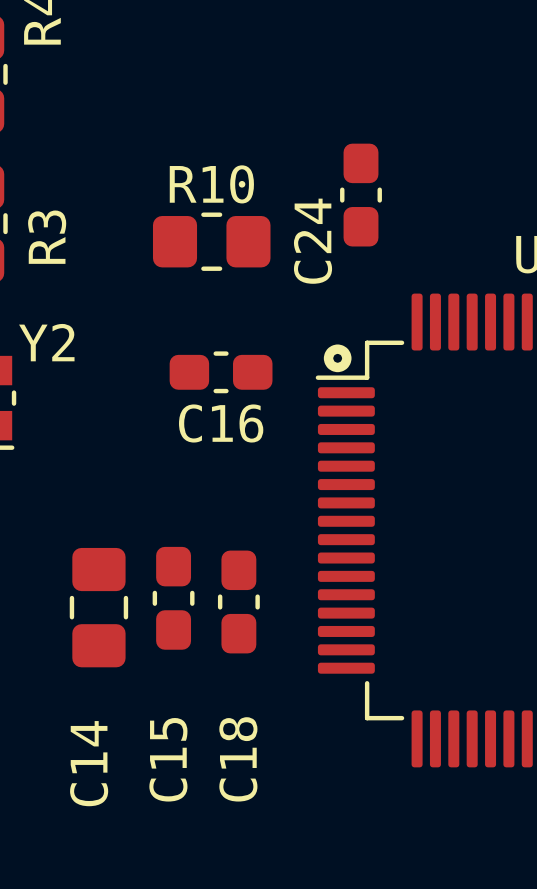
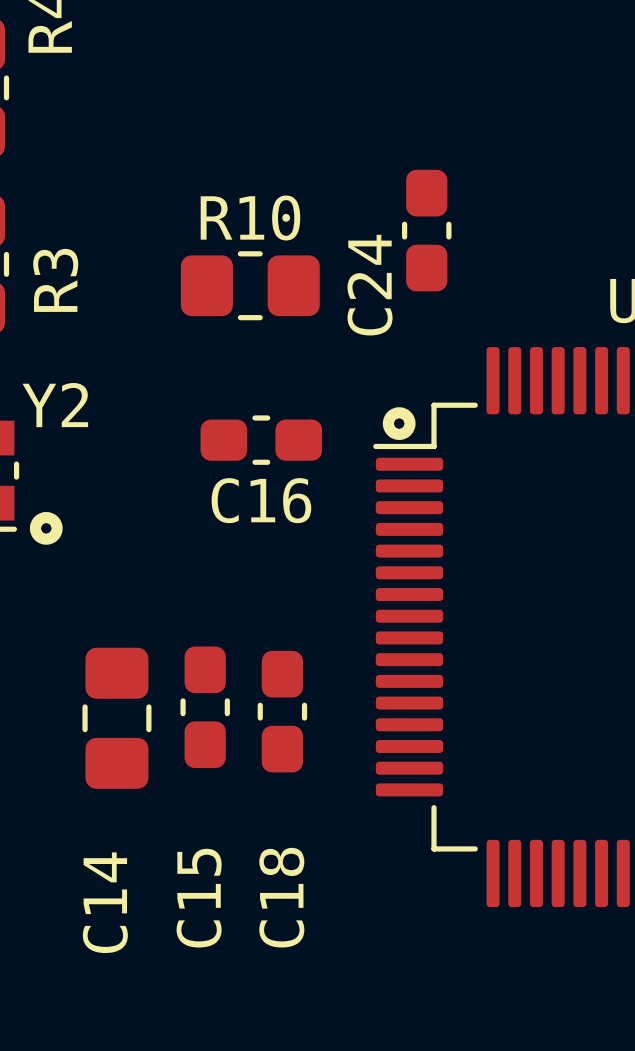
drawing: none -> [29, 511, 63, 545]

